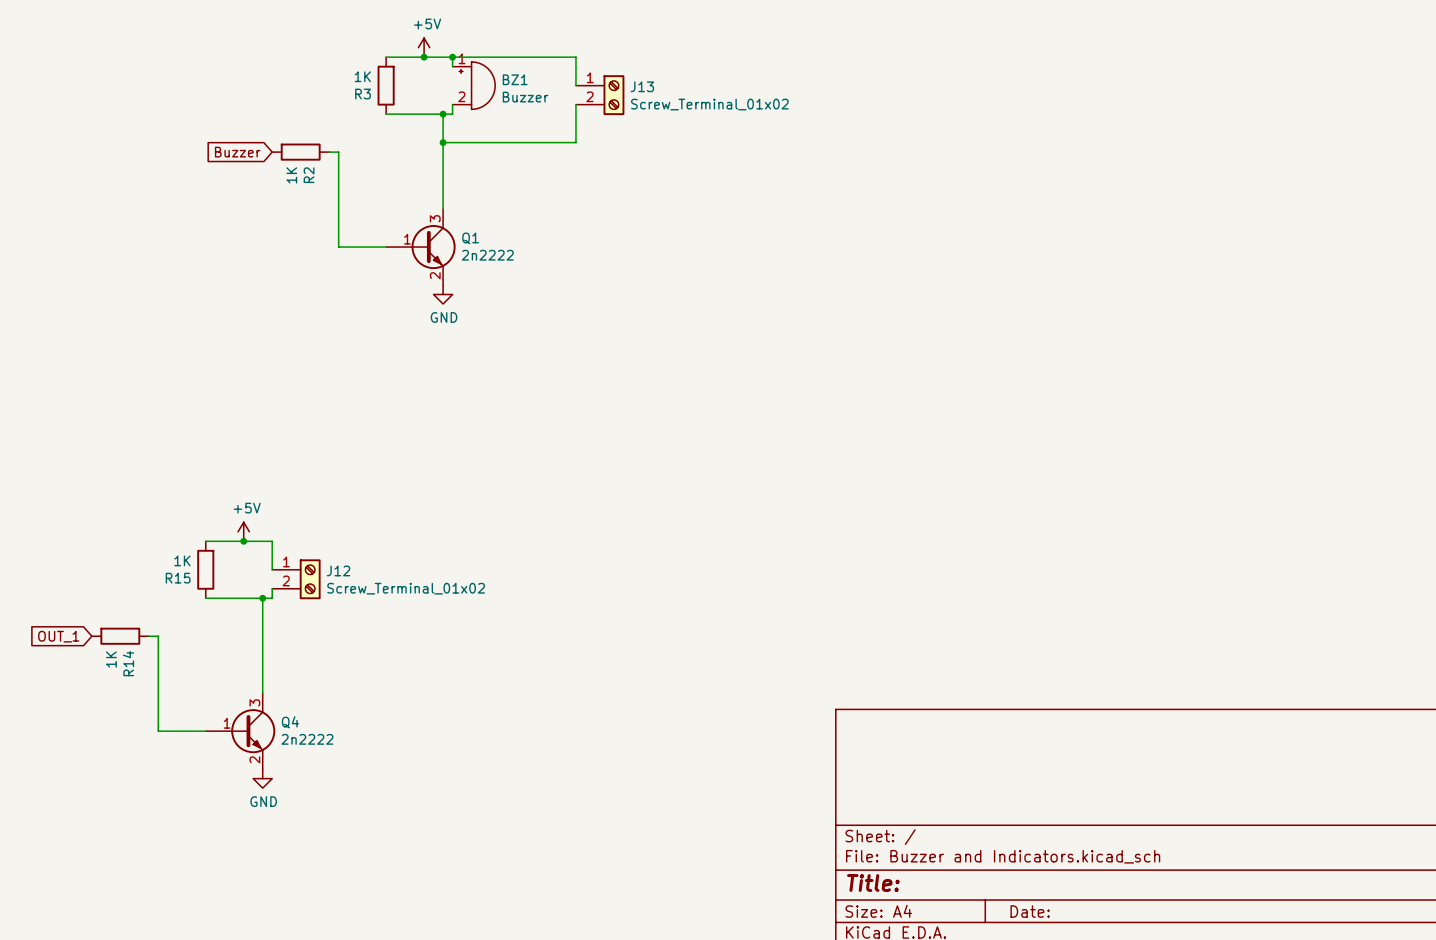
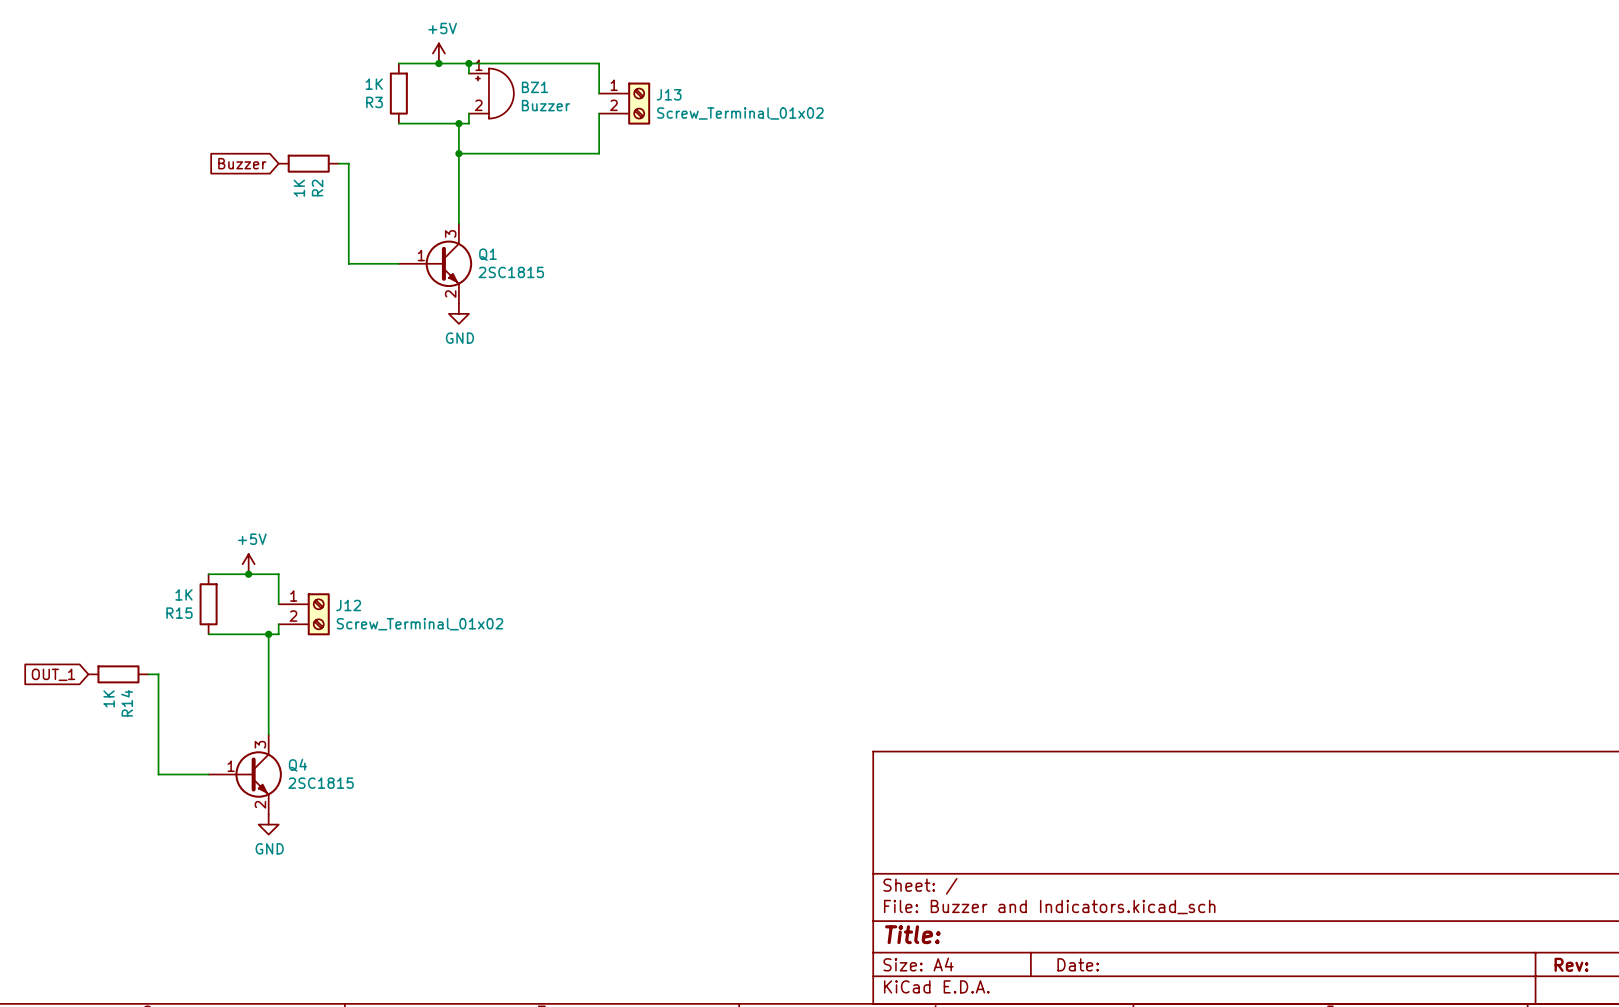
Q1 value: 2n2222 (487, 255) -> 2SC1815 (511, 272)
Q4 value: 2n2222 (307, 739) -> 2SC1815 (321, 783)

